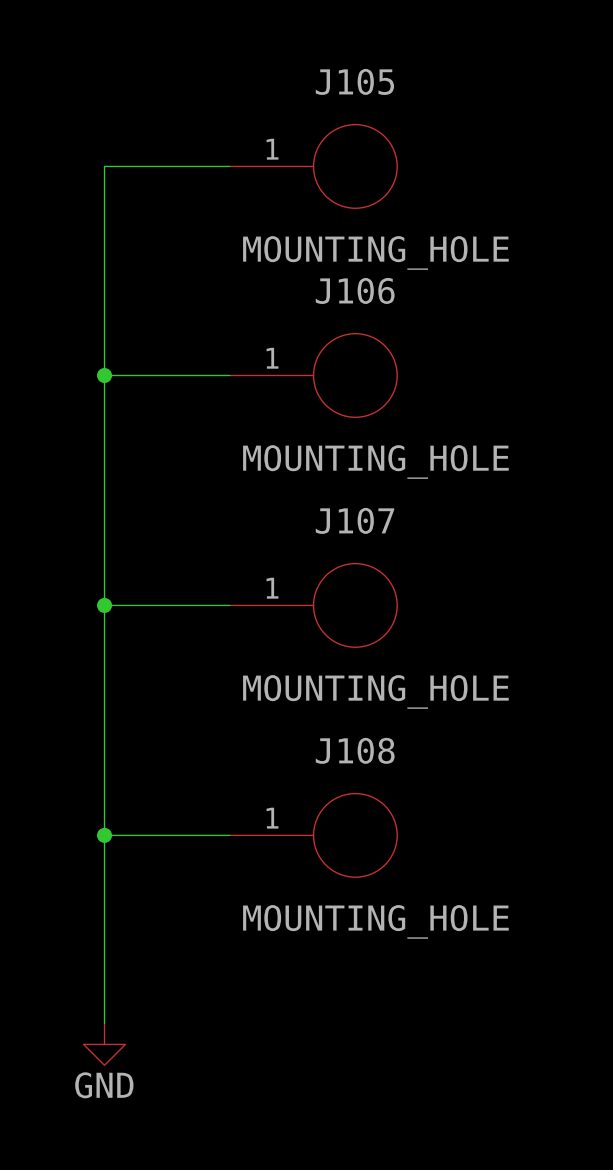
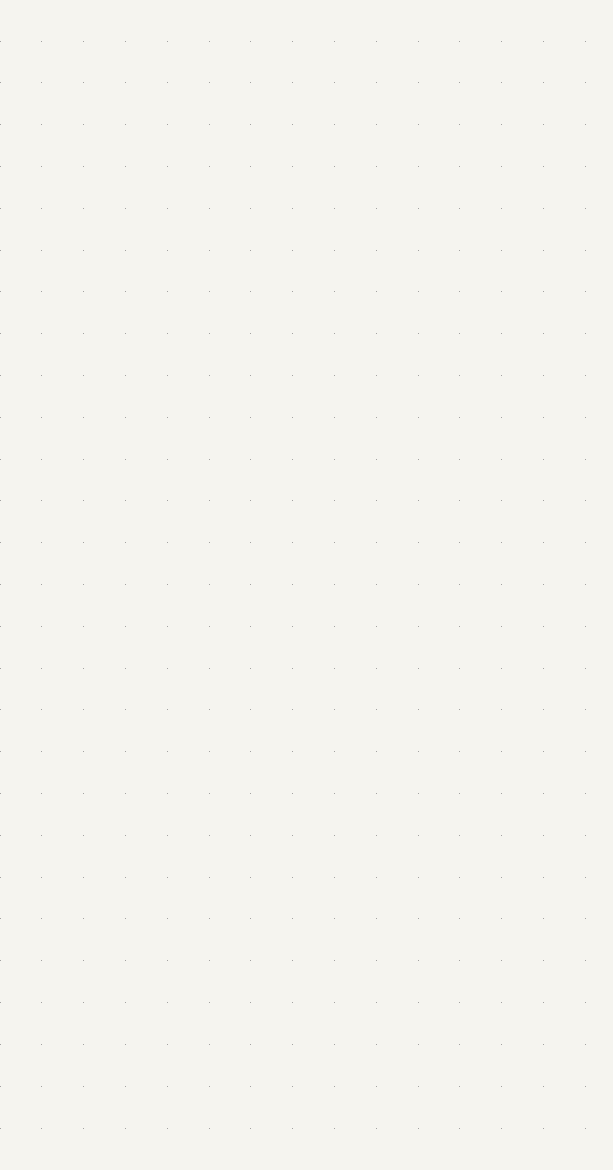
wire: (229, 166) (104, 166) (104, 1023) -> none
J105: MOUNTING_HOLE (313, 166) -> none
wire: (104, 375) (229, 375) -> none
junction: (104, 375) -> none
J106: MOUNTING_HOLE (313, 375) -> none
wire: (104, 605) (229, 605) -> none
junction: (104, 605) -> none
J107: MOUNTING_HOLE (313, 605) -> none
wire: (104, 835) (229, 835) -> none
junction: (104, 835) -> none
J108: MOUNTING_HOLE (313, 835) -> none
power symbol: GND (104, 1044) -> none

